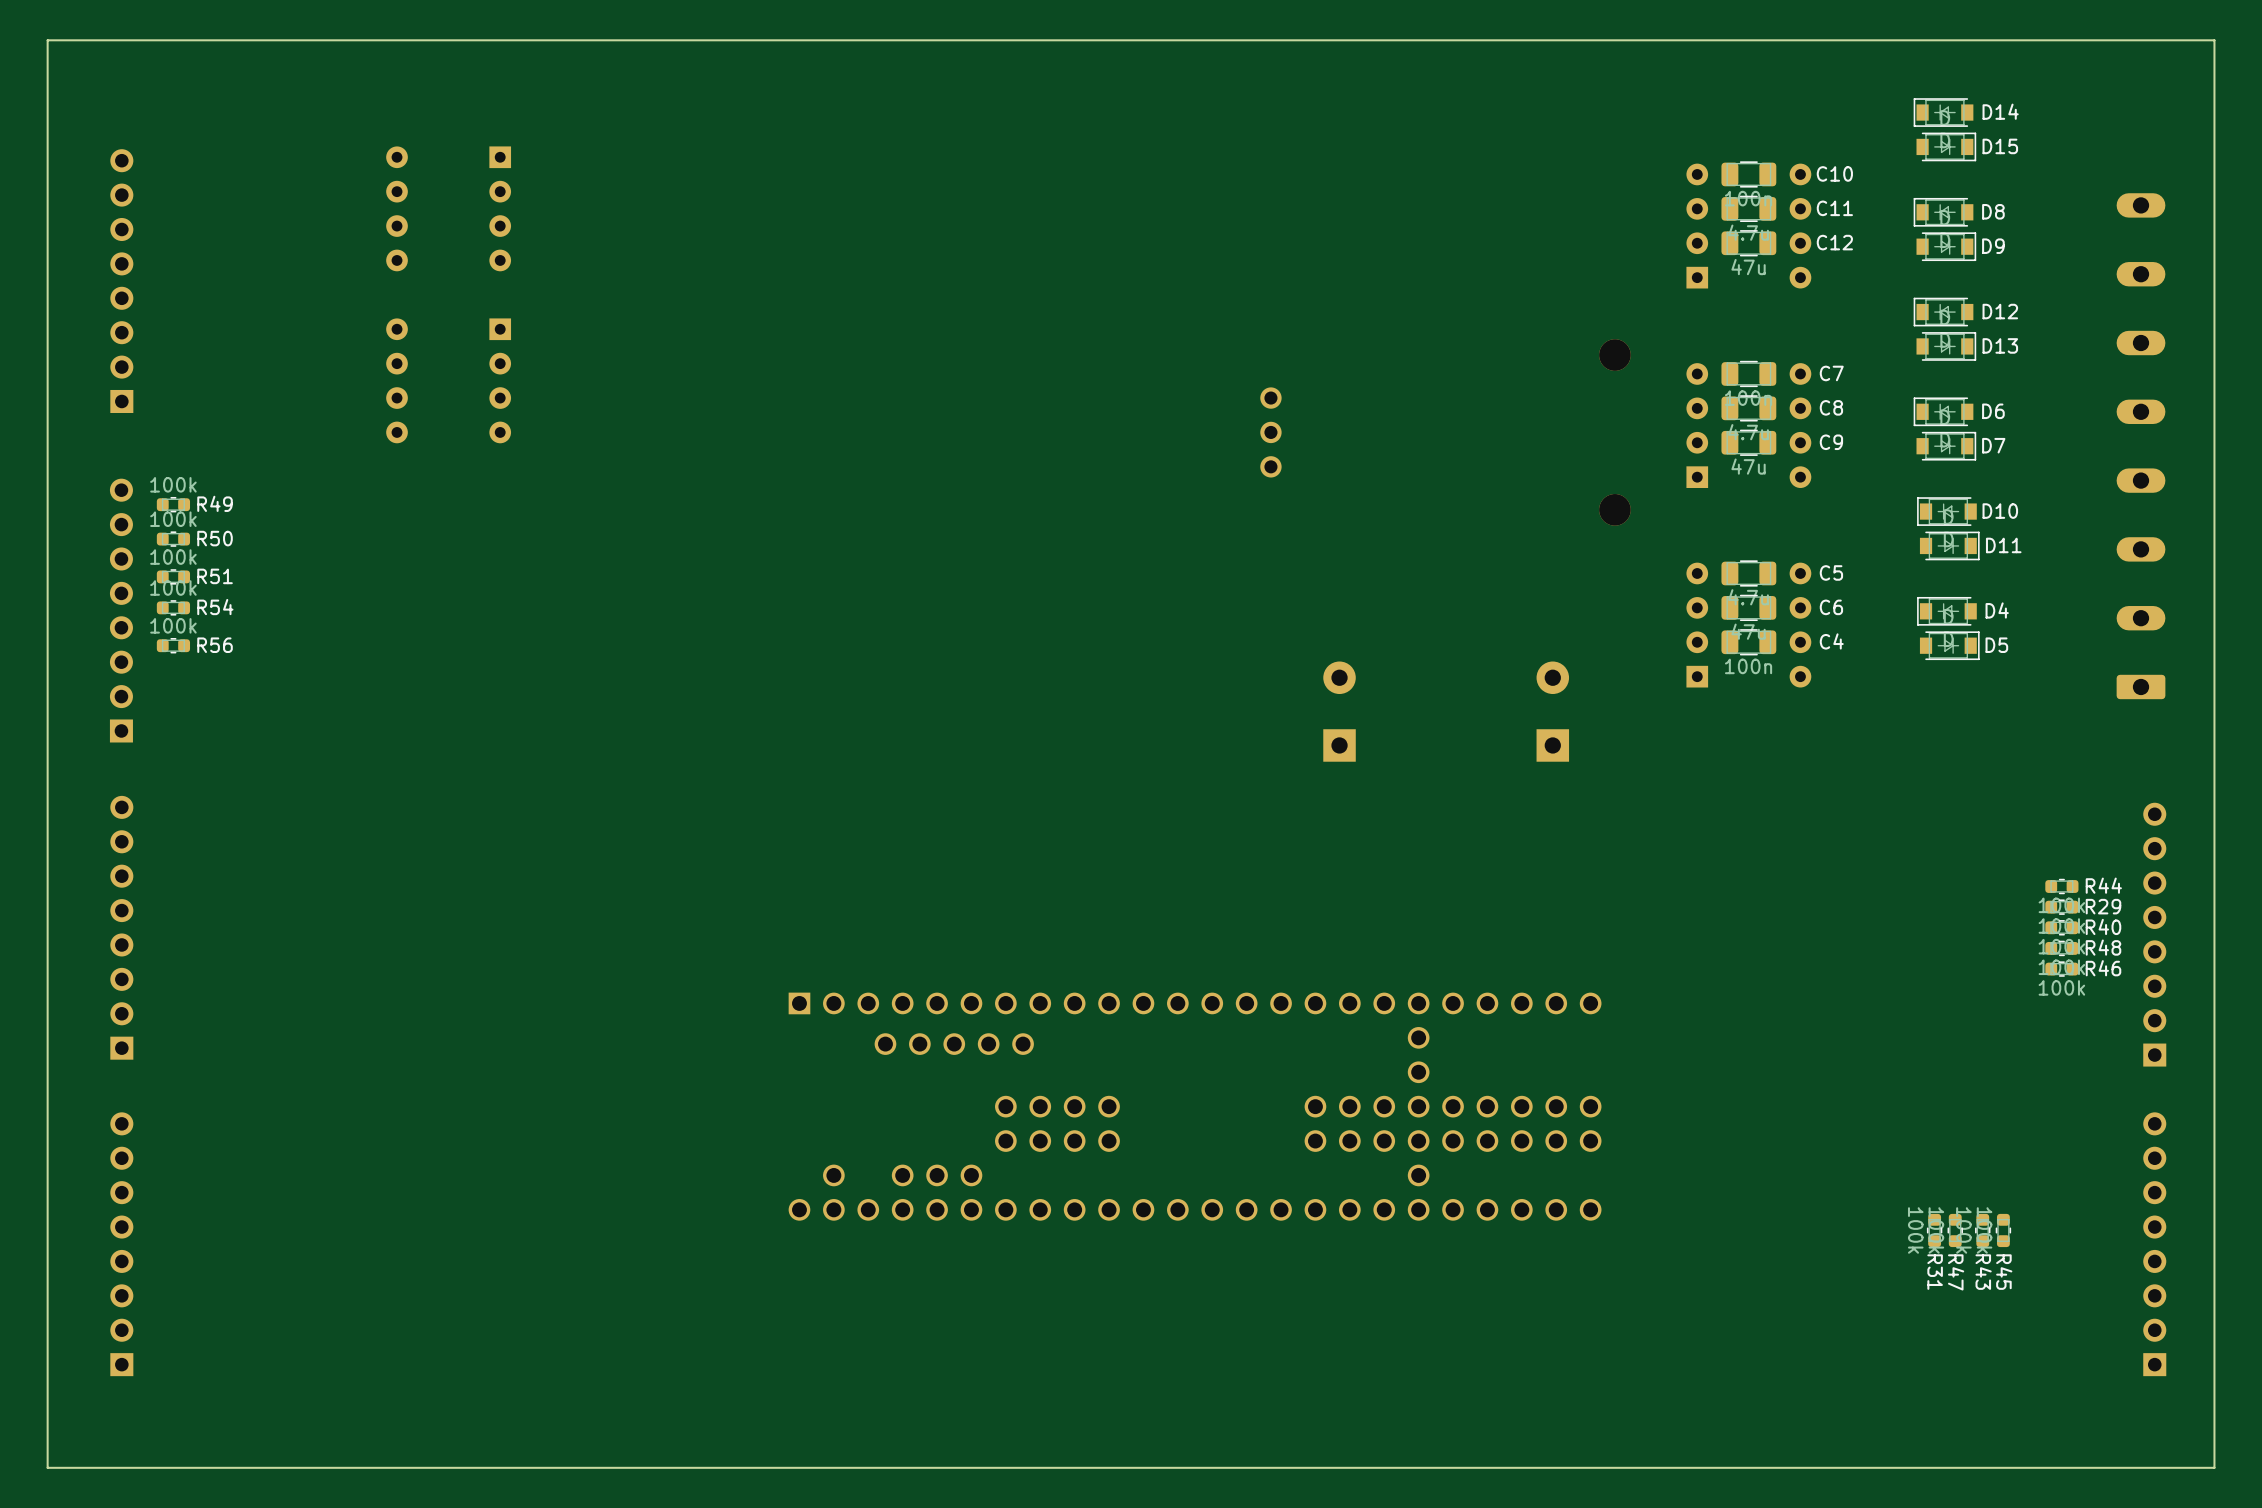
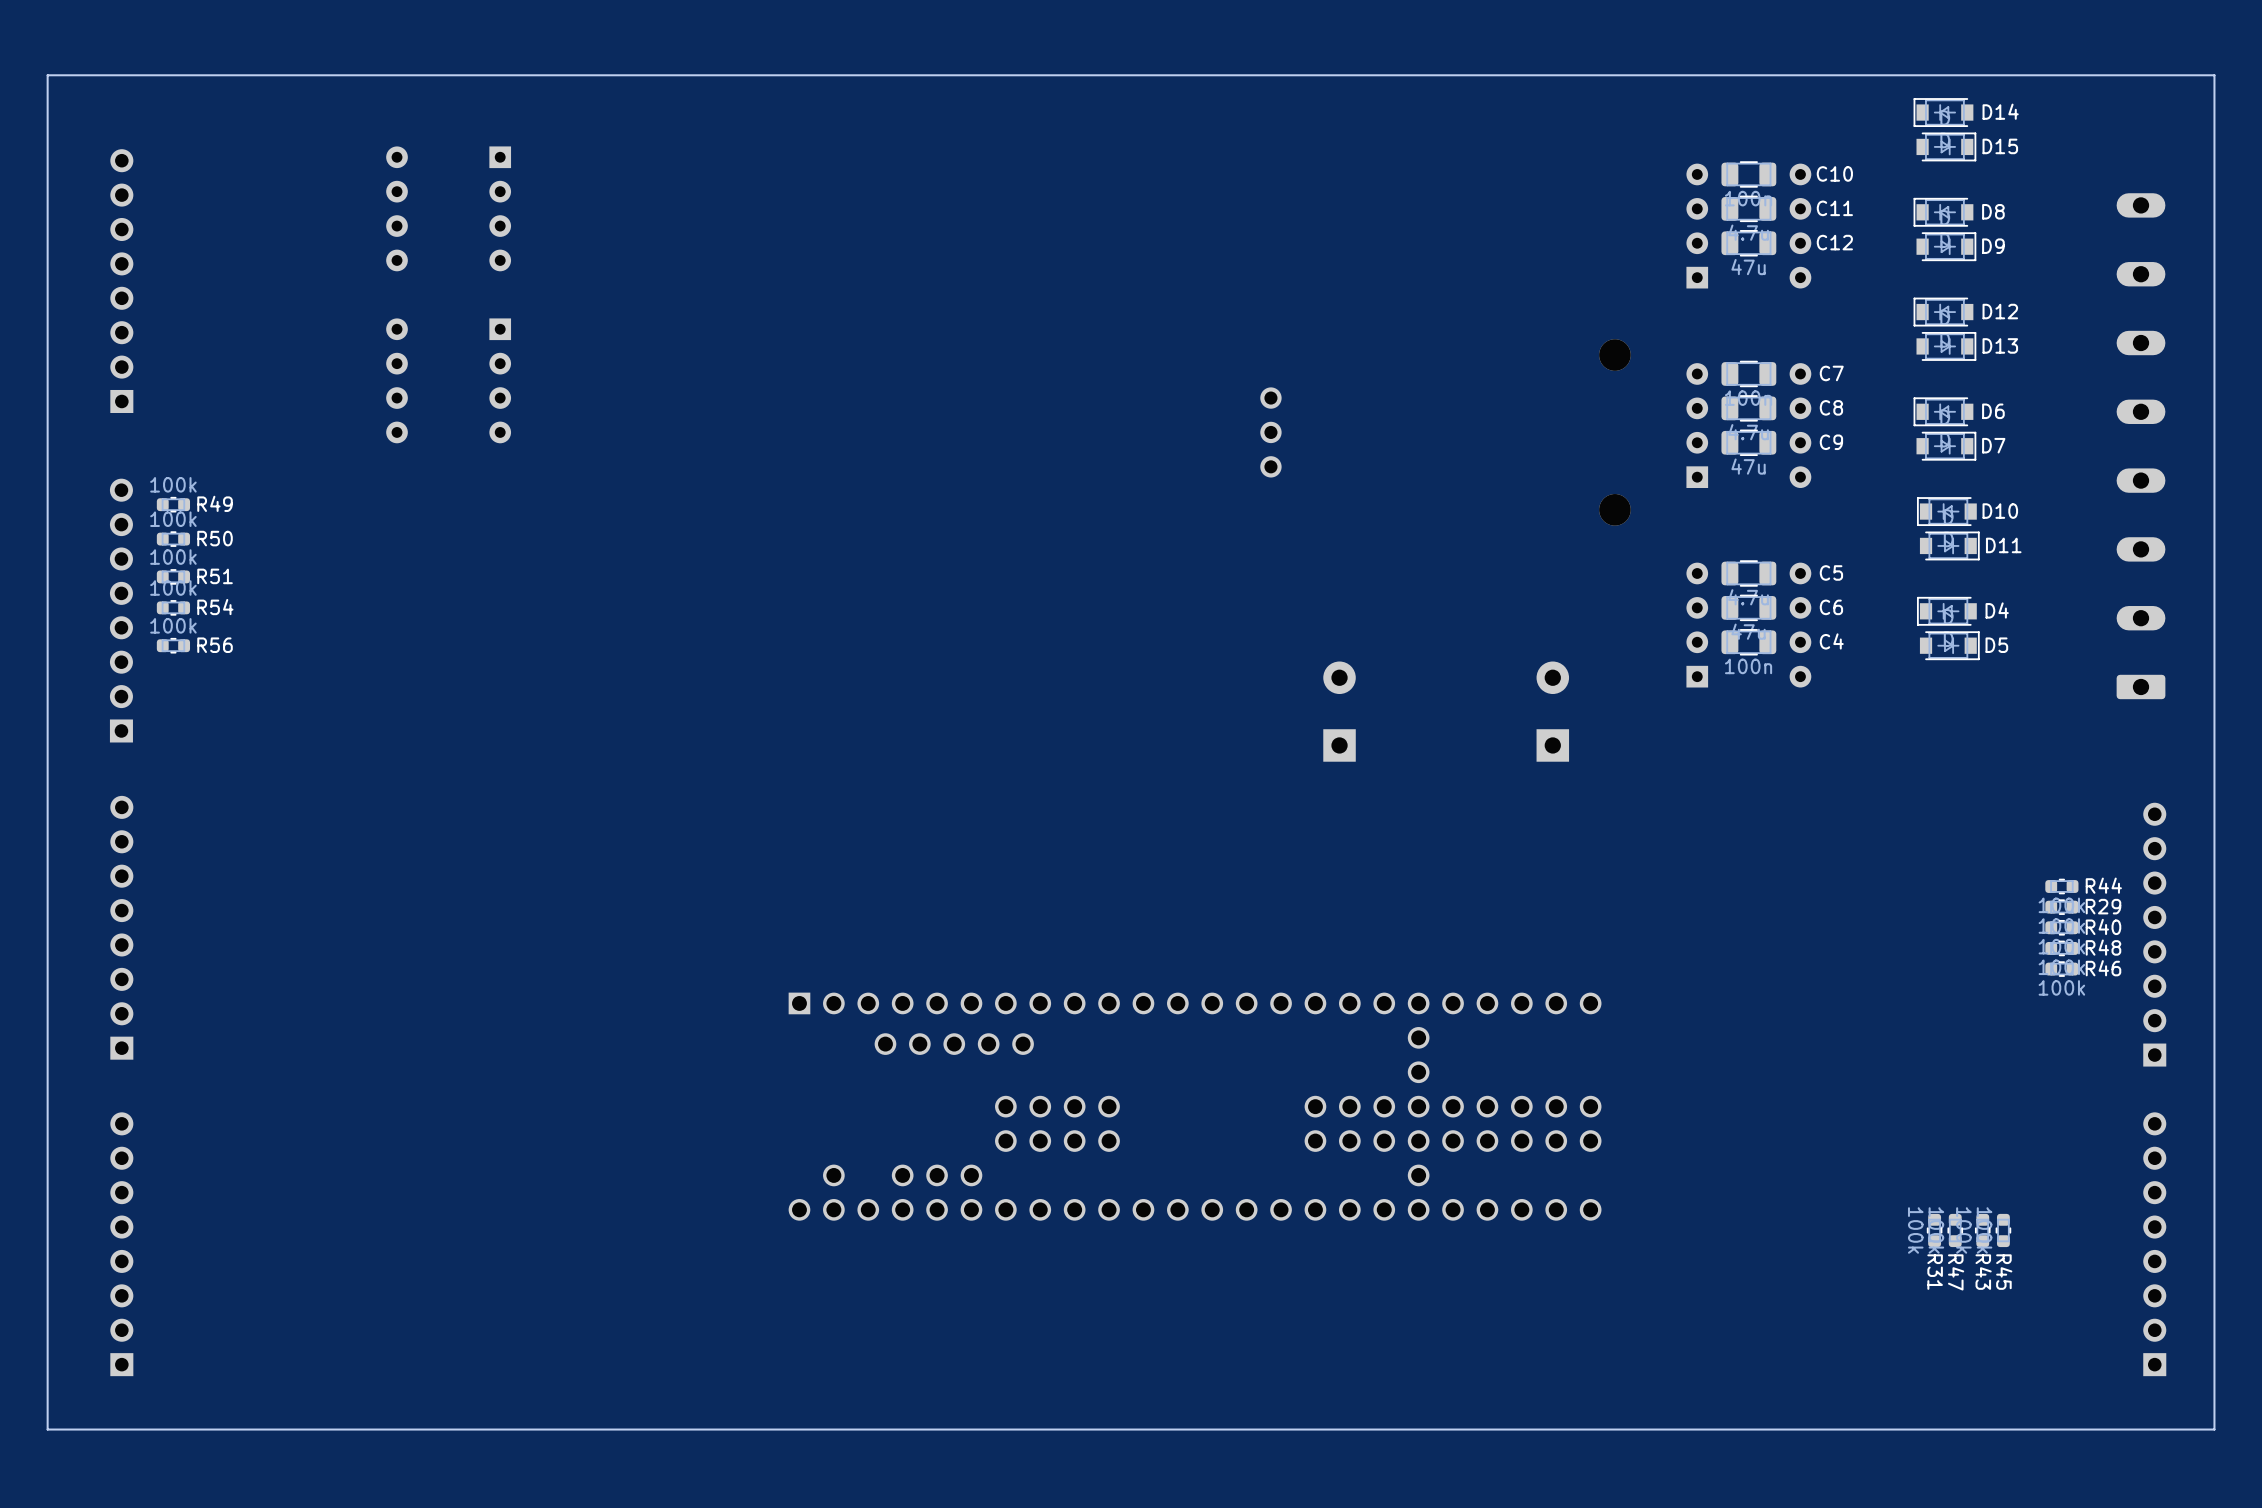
board edge: (2214, 75) (2214, 40) (47, 40) (47, 75) -> (2214, 75) (47, 75)
board edge: (2214, 1429) (2214, 1467) (47, 1467) (47, 1429) -> (2214, 1429) (47, 1429)

